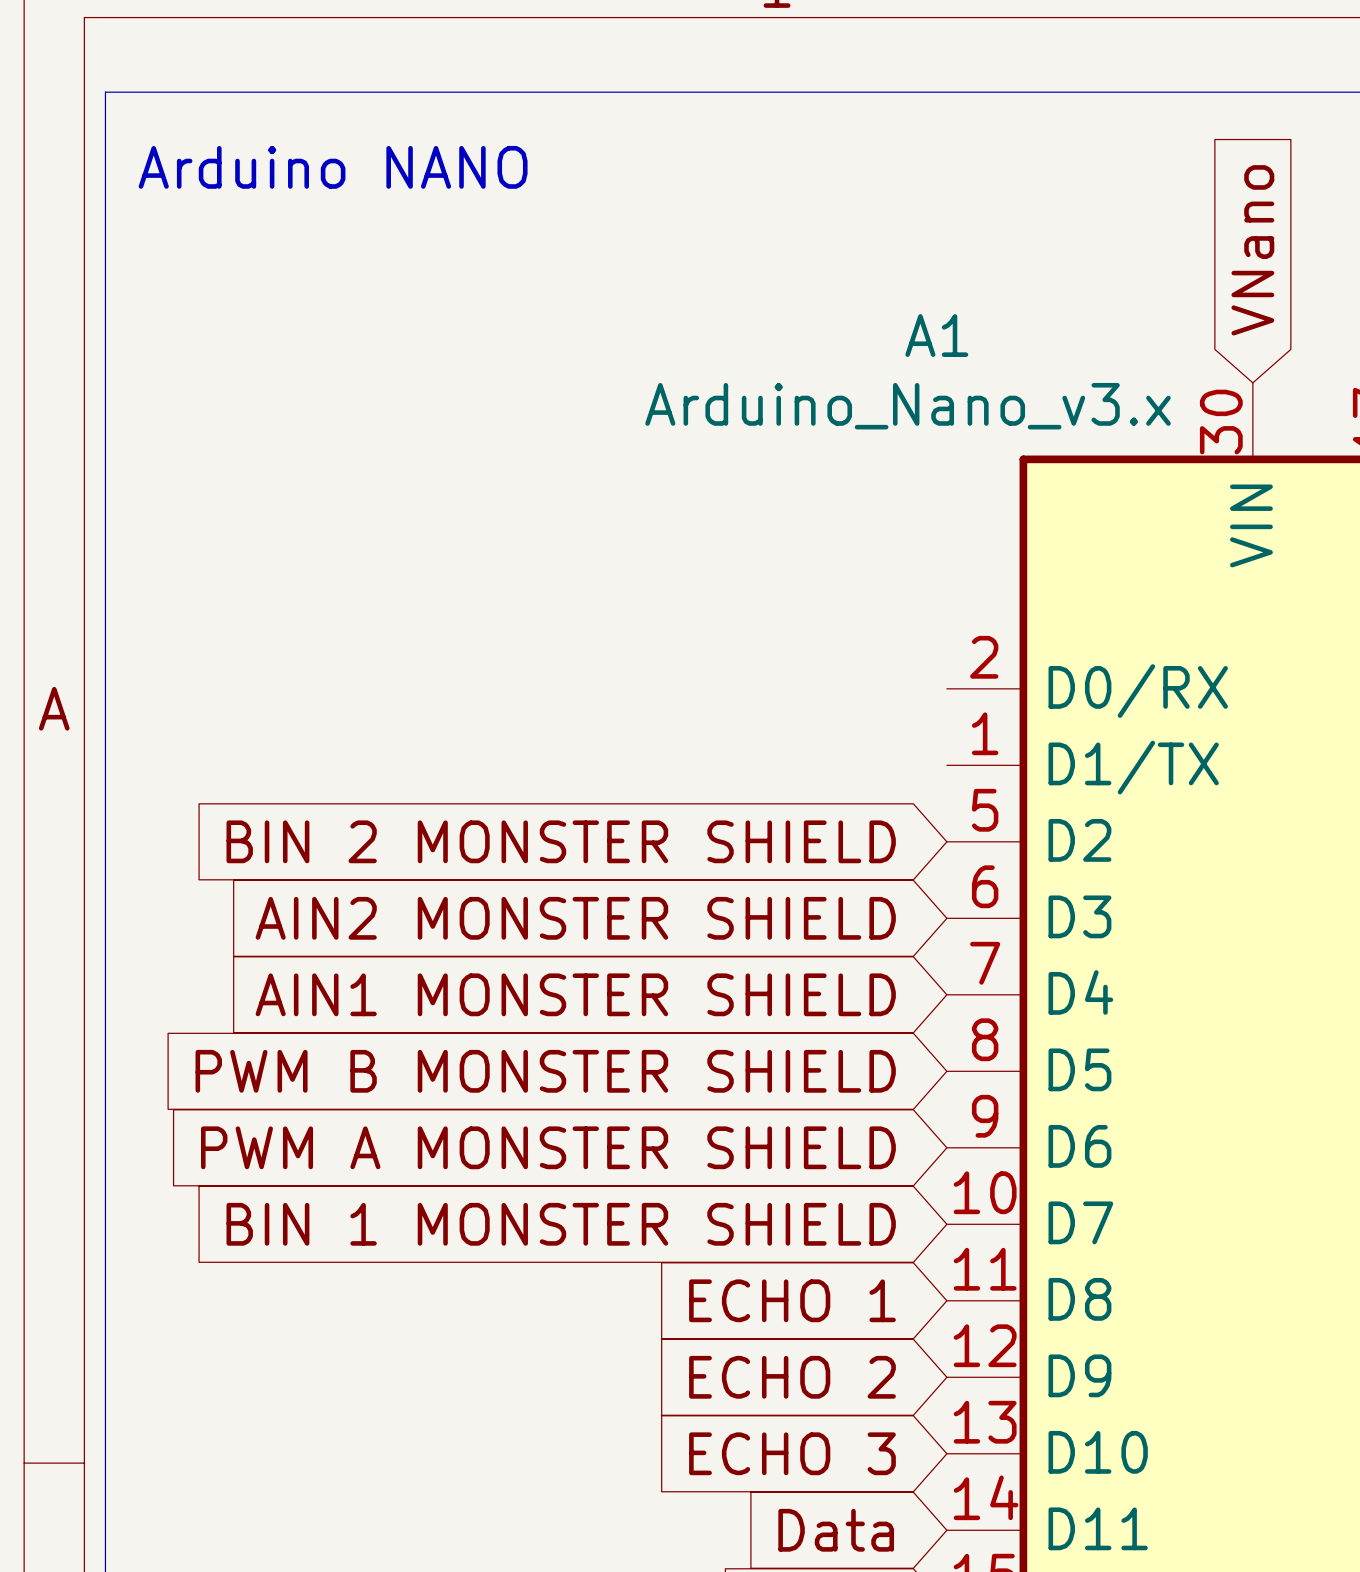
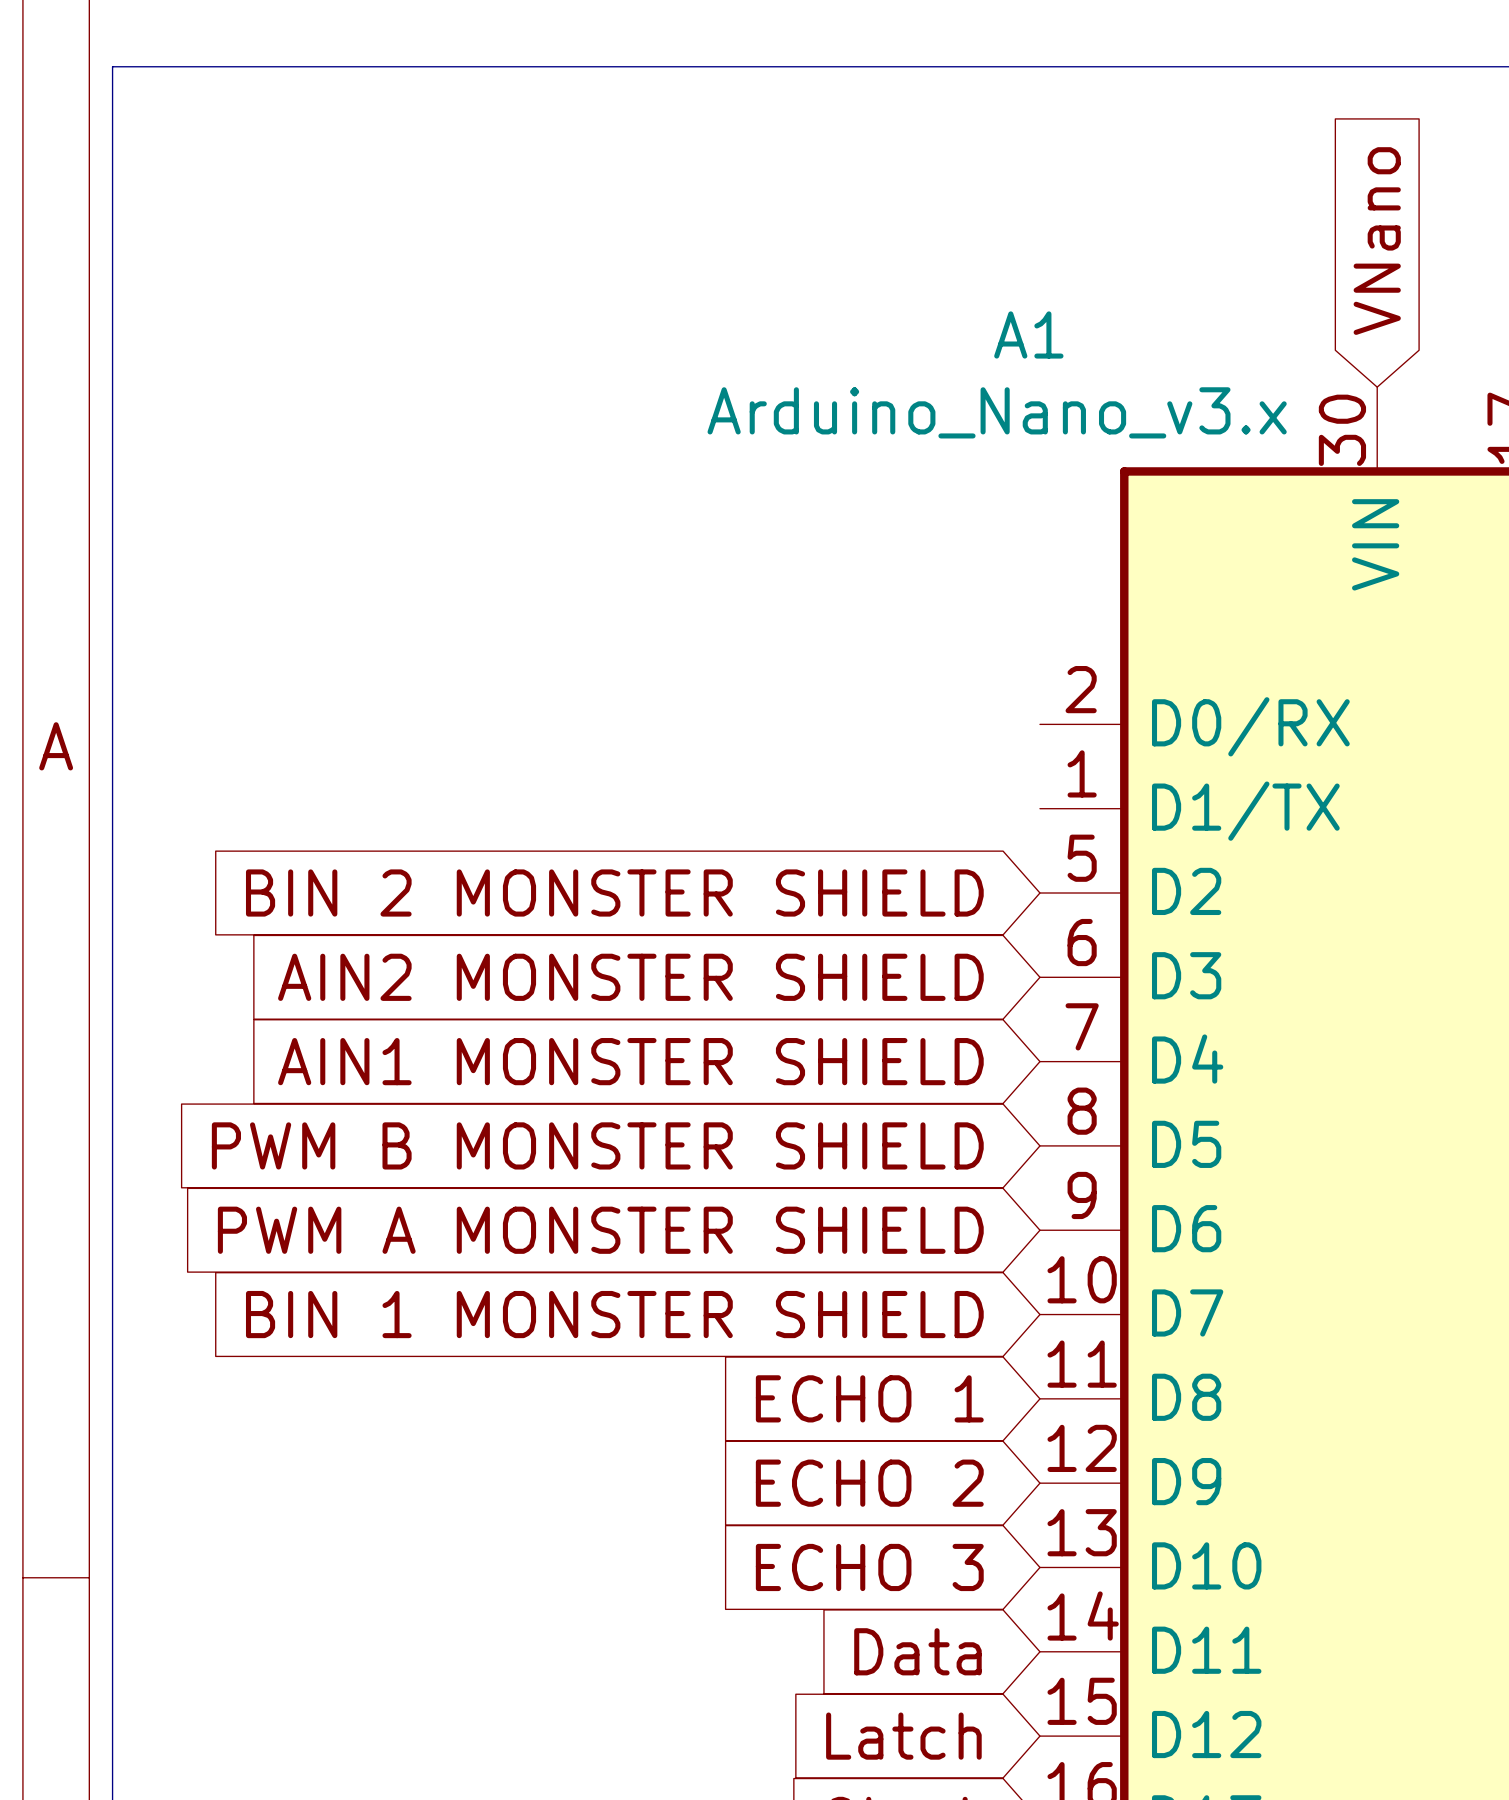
text: Arduino NANO (333, 167) -> none

